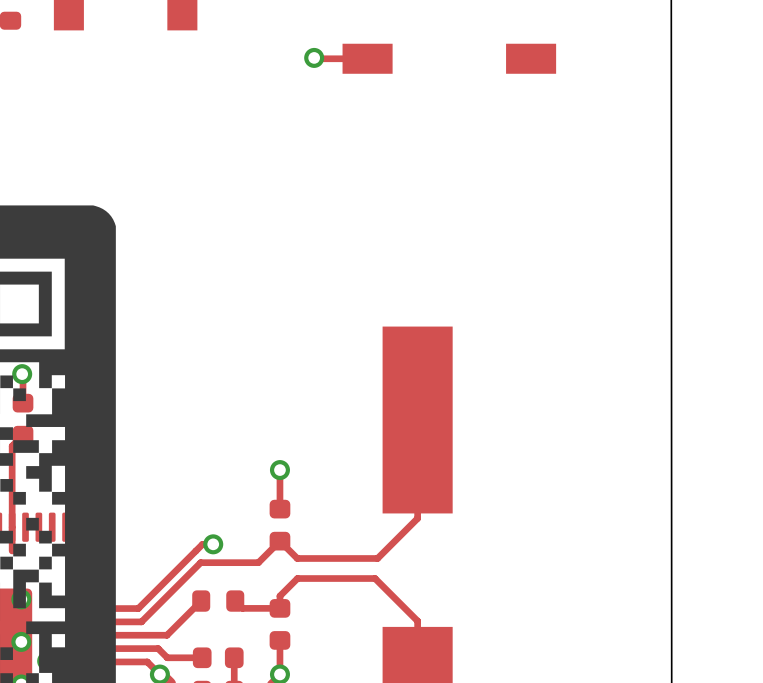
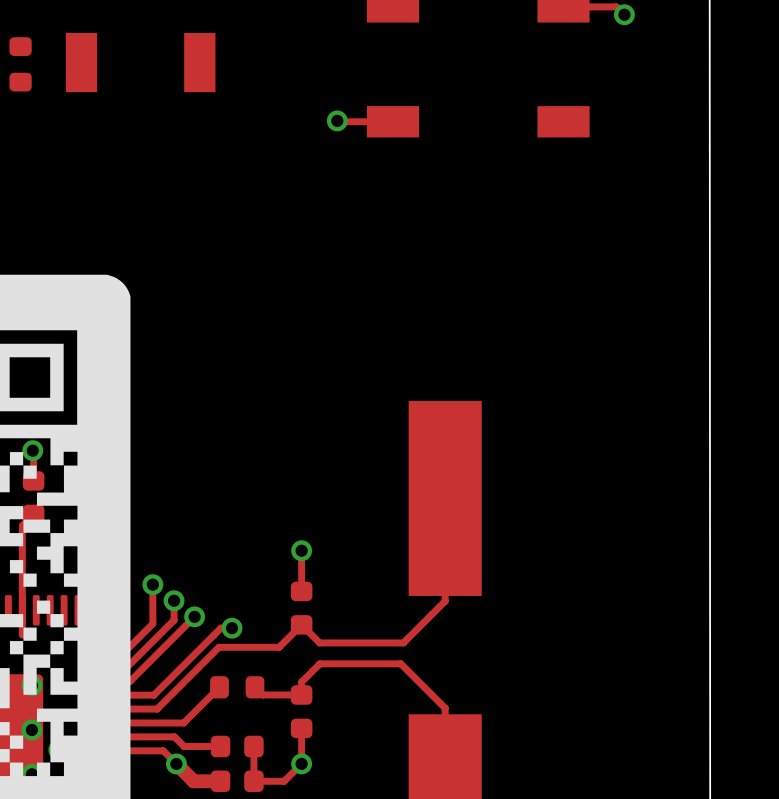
top track: none -> (152, 584) (152, 623) (123, 653) (107, 653)
via: none -> (152, 584)
top track: none -> (174, 600) (174, 620) (126, 667) (107, 667)
via: none -> (174, 600)
top track: none -> (194, 616) (130, 681) (107, 681)
via: none -> (194, 616)

